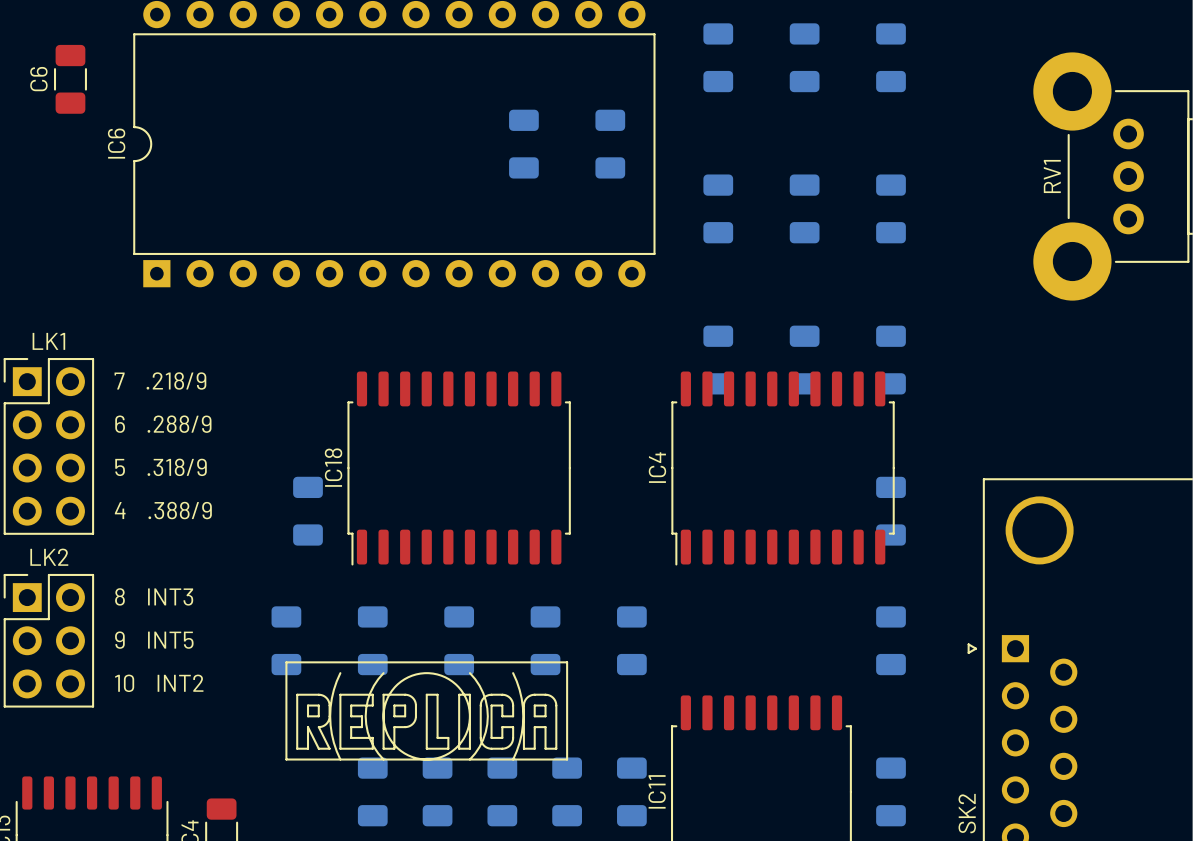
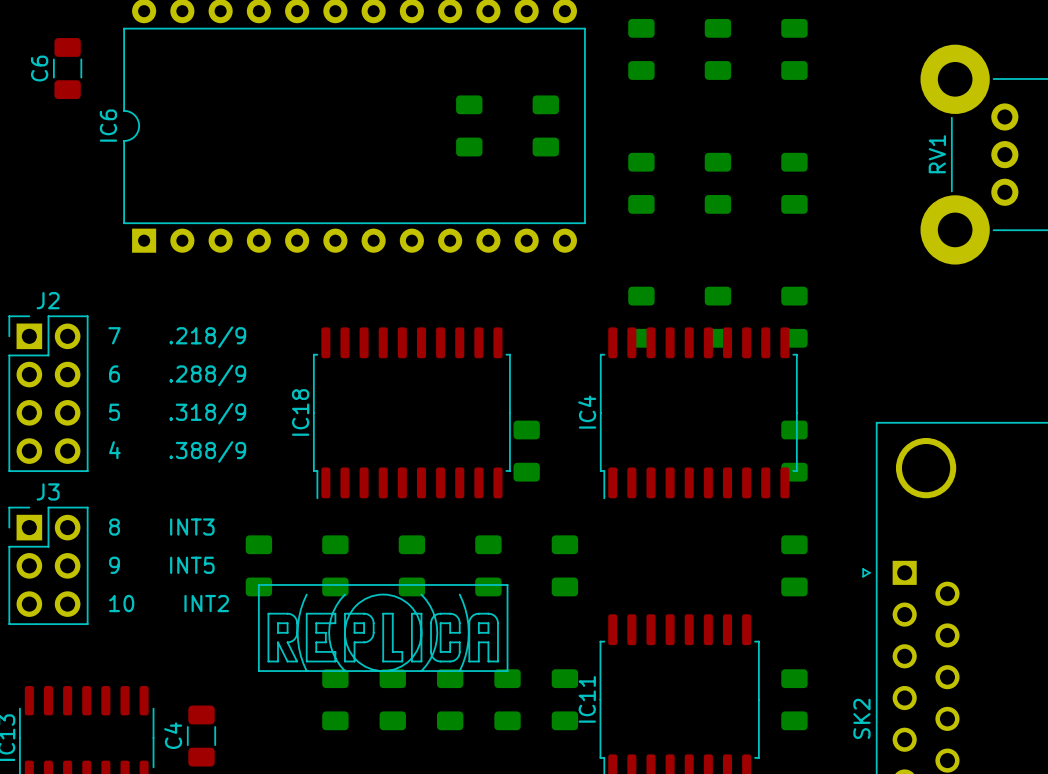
LK1 name: LK1 (48, 341) -> J2 (48, 300)
part: (308, 511) -> none
part: none -> (526, 451)
LK2 name: LK2 (49, 557) -> J3 (48, 491)

